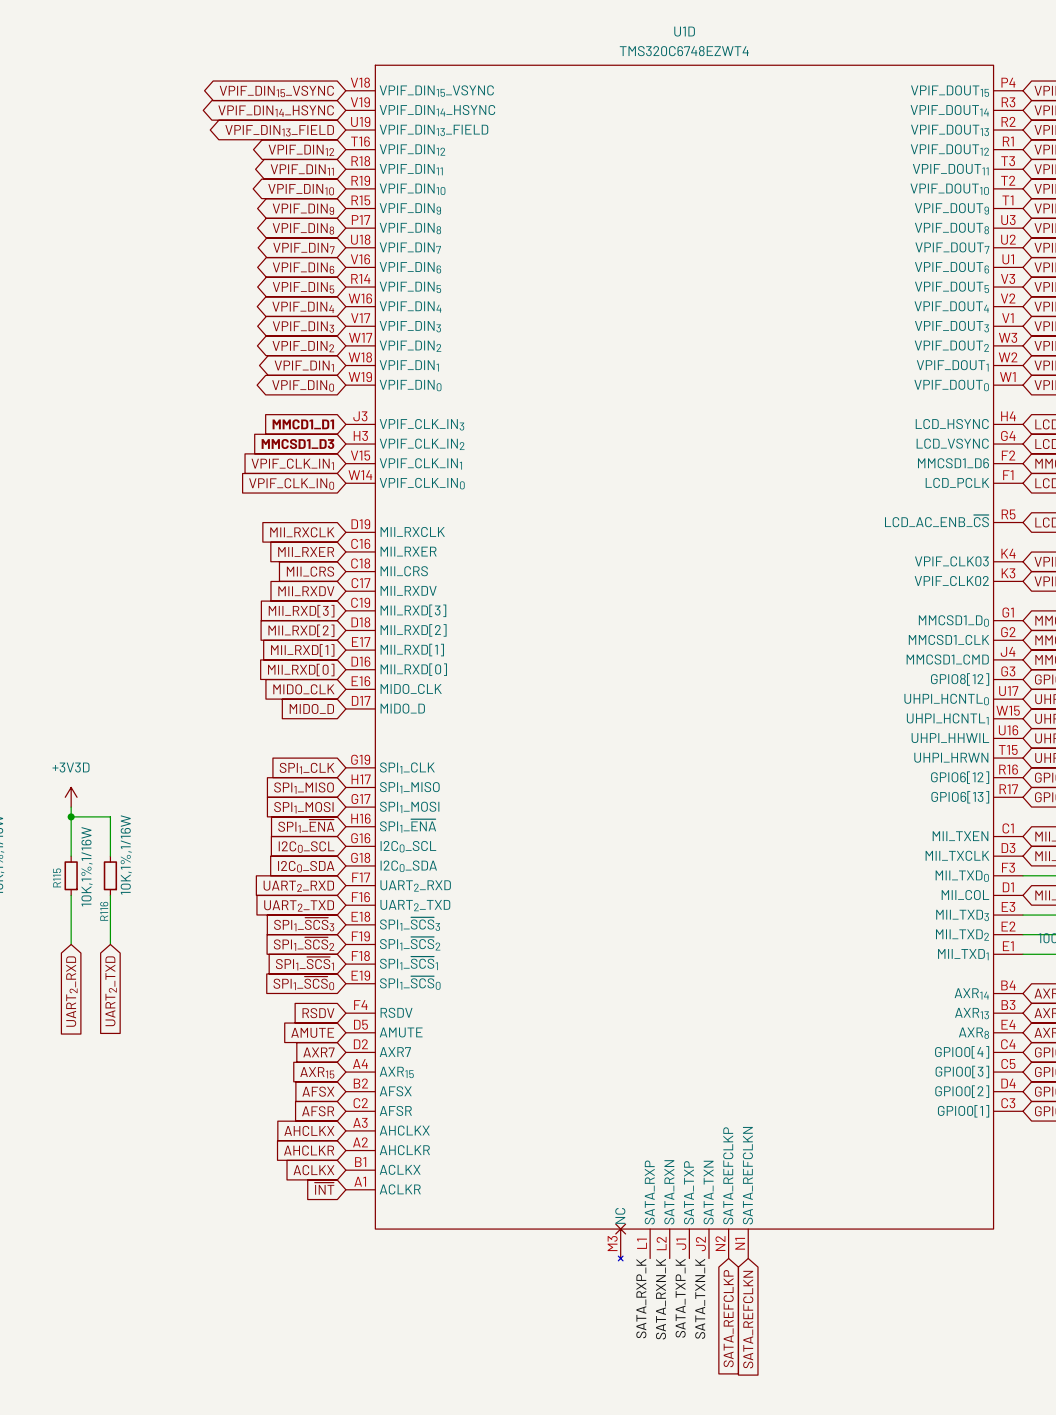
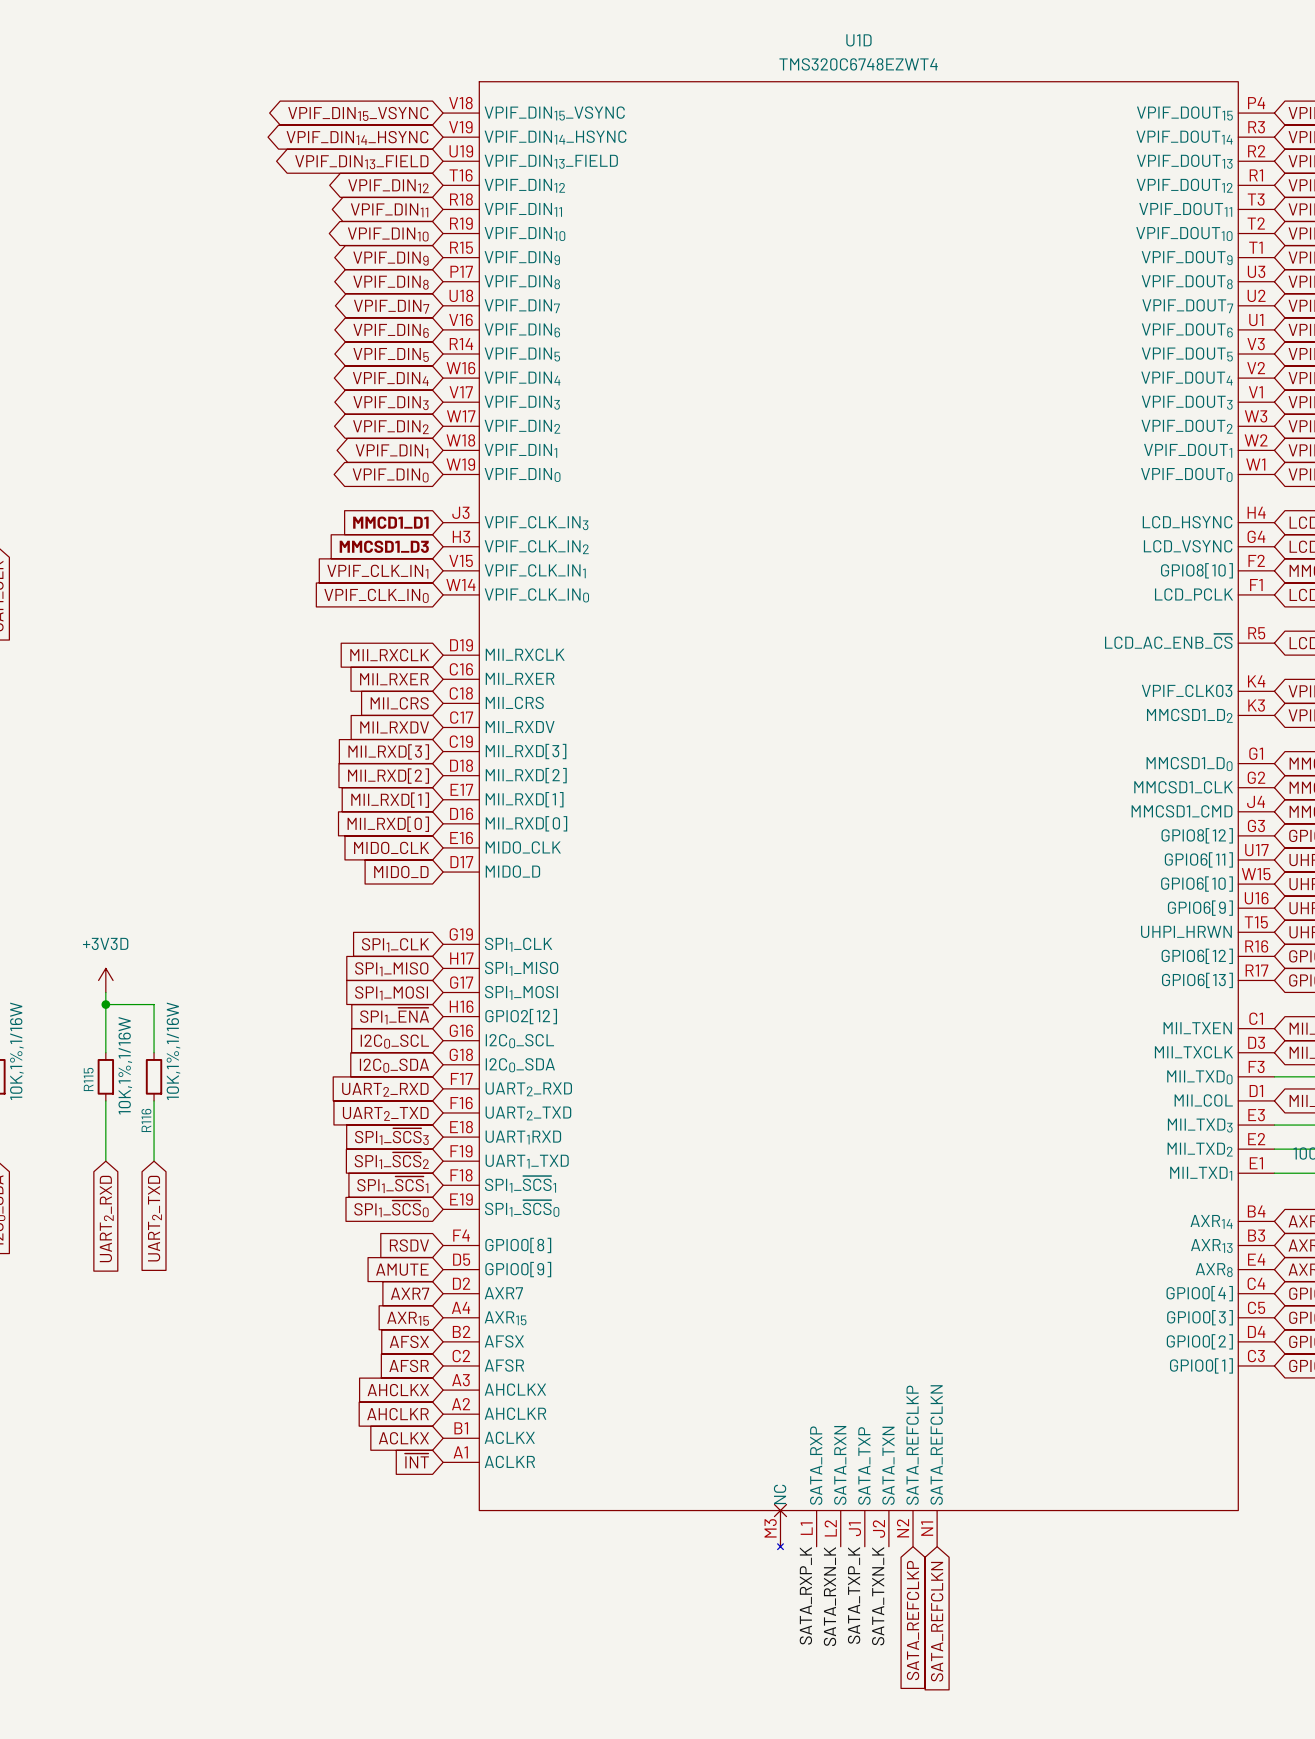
U1D symbol: [345, 65, 1024, 1261] -> [443, 81, 1275, 1550]

